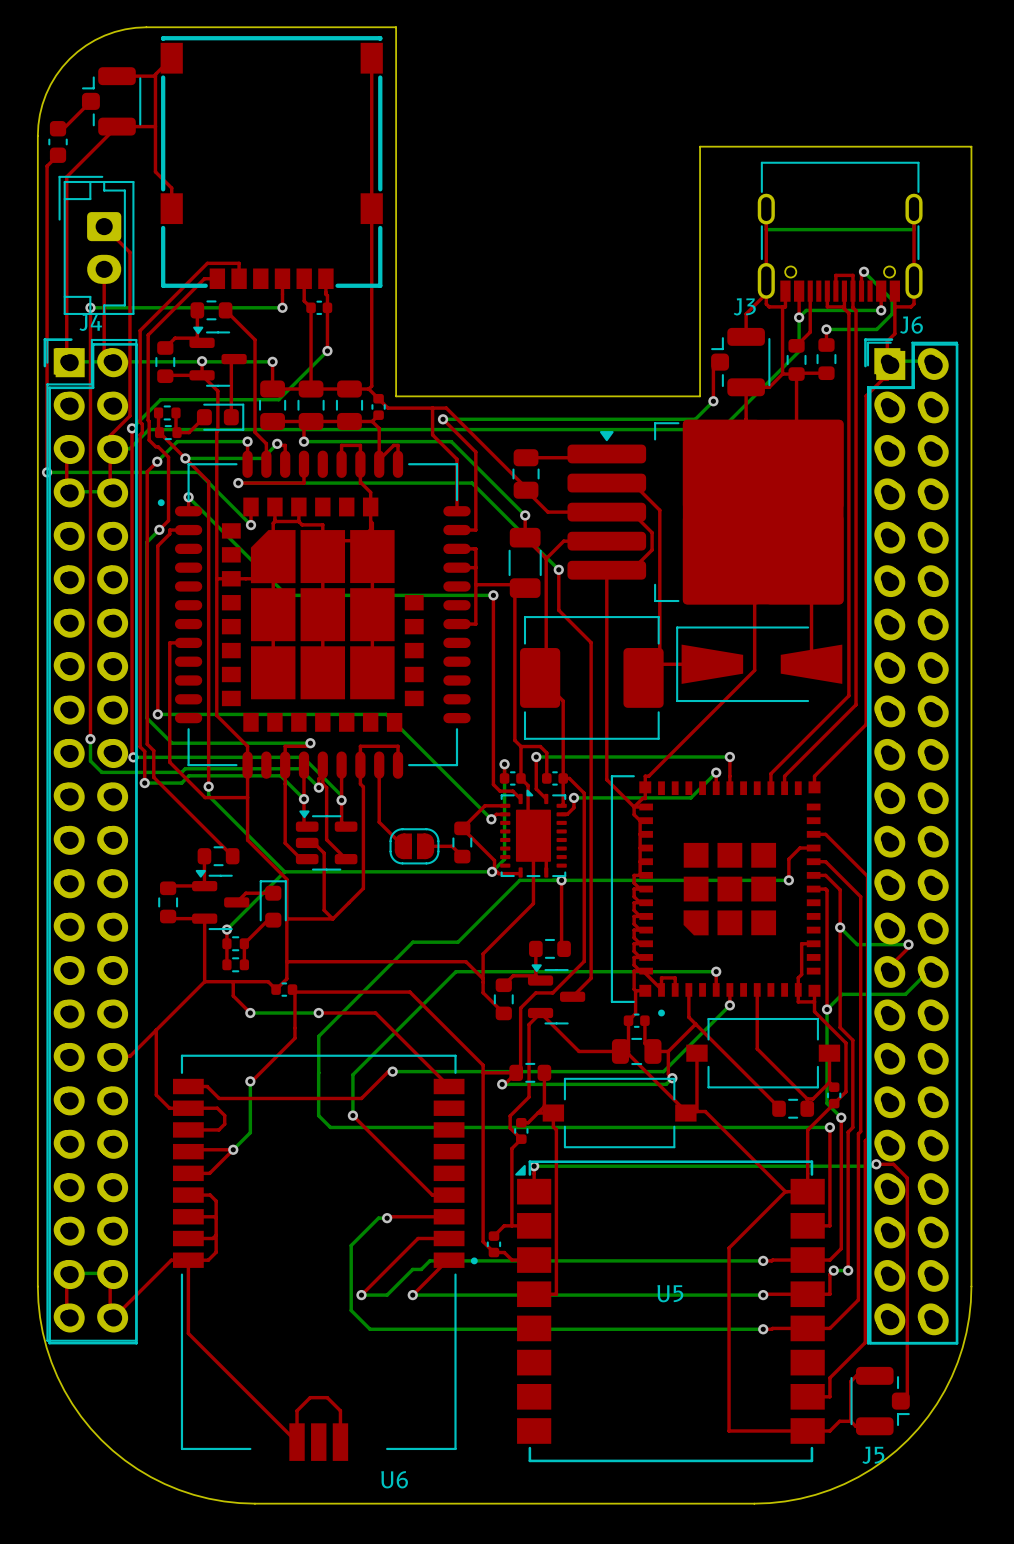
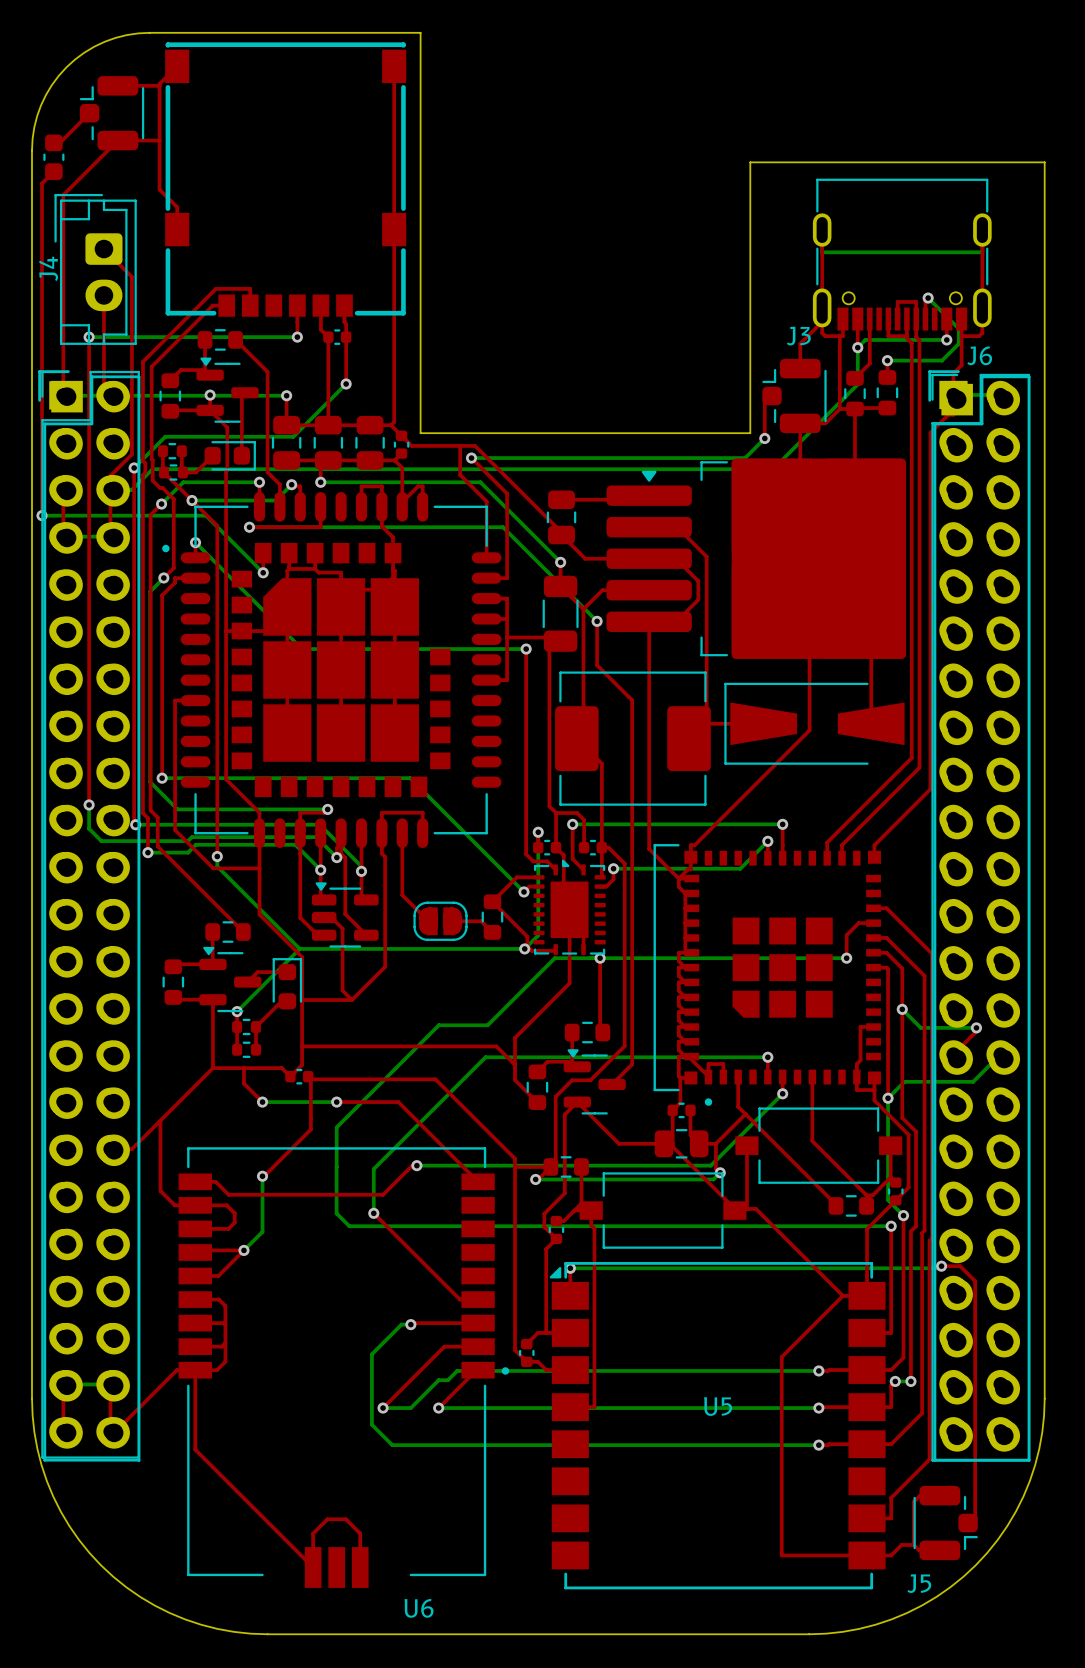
J4 name rotation: 0° (90, 322) -> 90° counterclockwise (48, 268)
J4 name position: J4 (90, 322) -> J4 (48, 268)
J5 name position: J5 (873, 1455) -> J5 (919, 1583)

